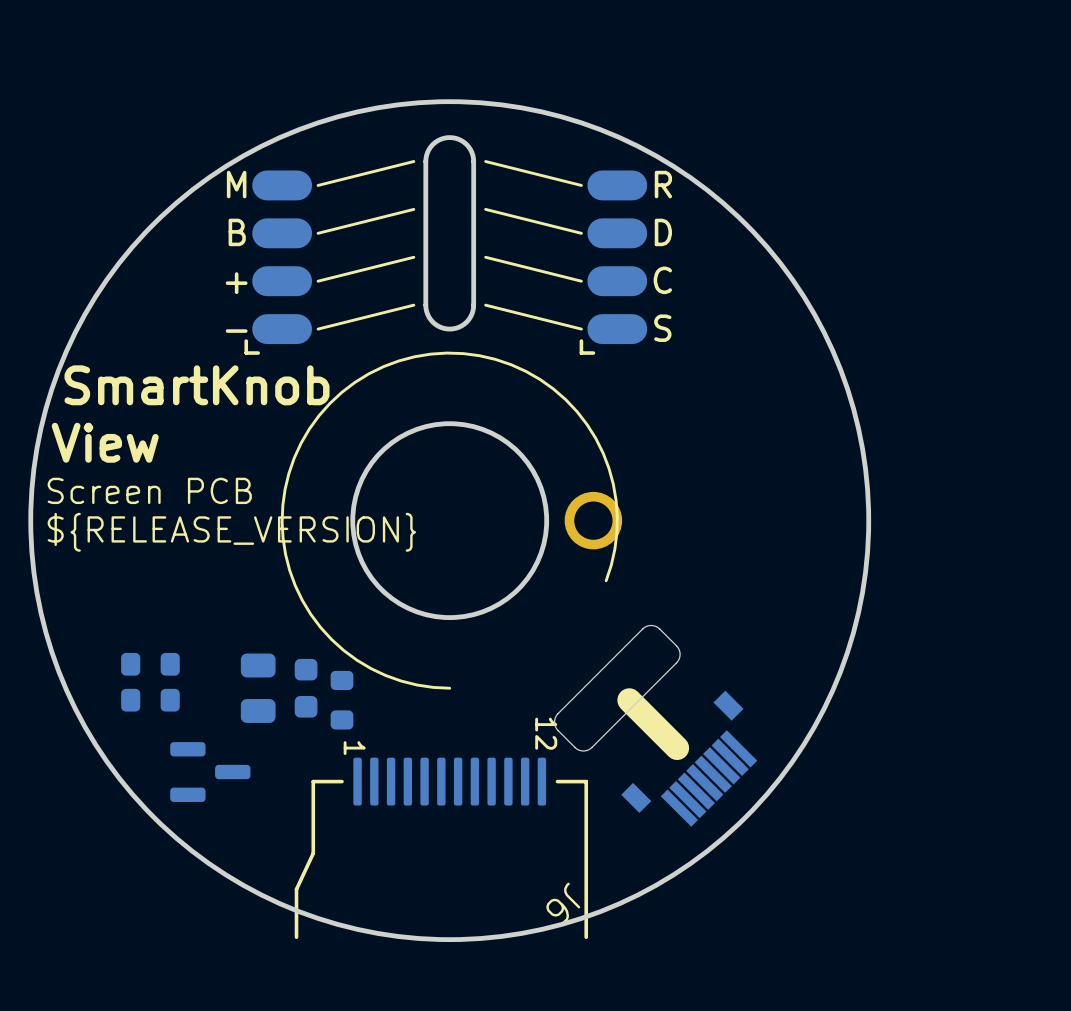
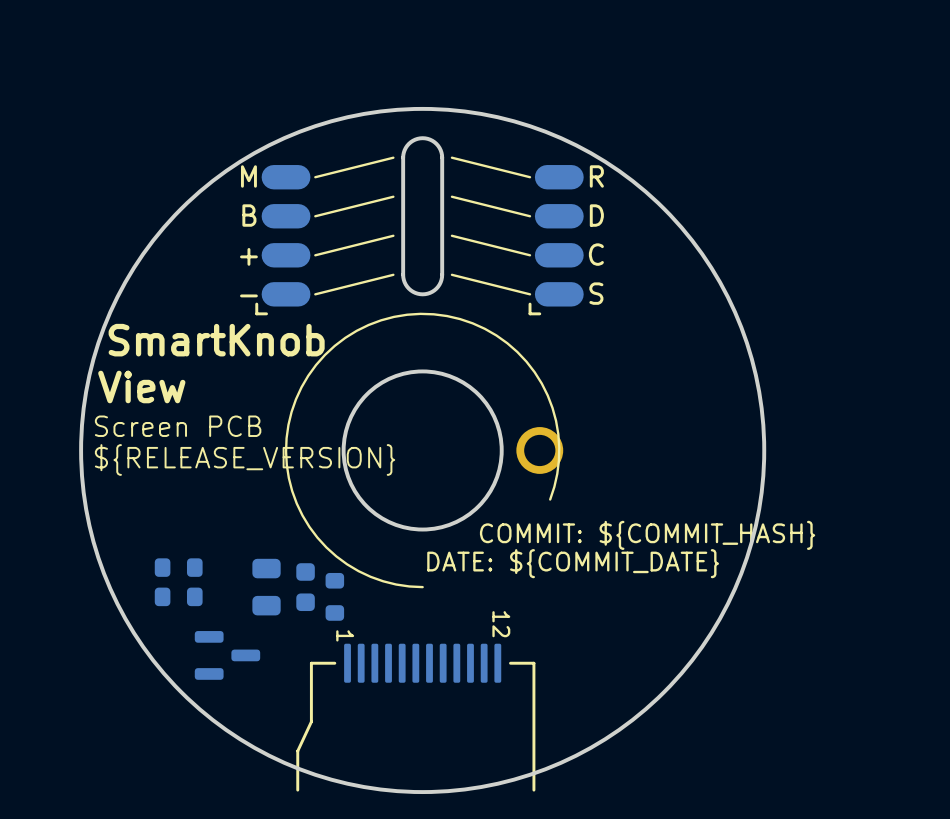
drawing: [553, 624, 681, 752] -> none
text: none -> COMMIT: ${COMMIT_HASH} (647, 535)
text: none -> DATE: ${COMMIT_DATE} (573, 563)
line: (629, 700) (677, 748) -> none
J6: (689, 758) -> none

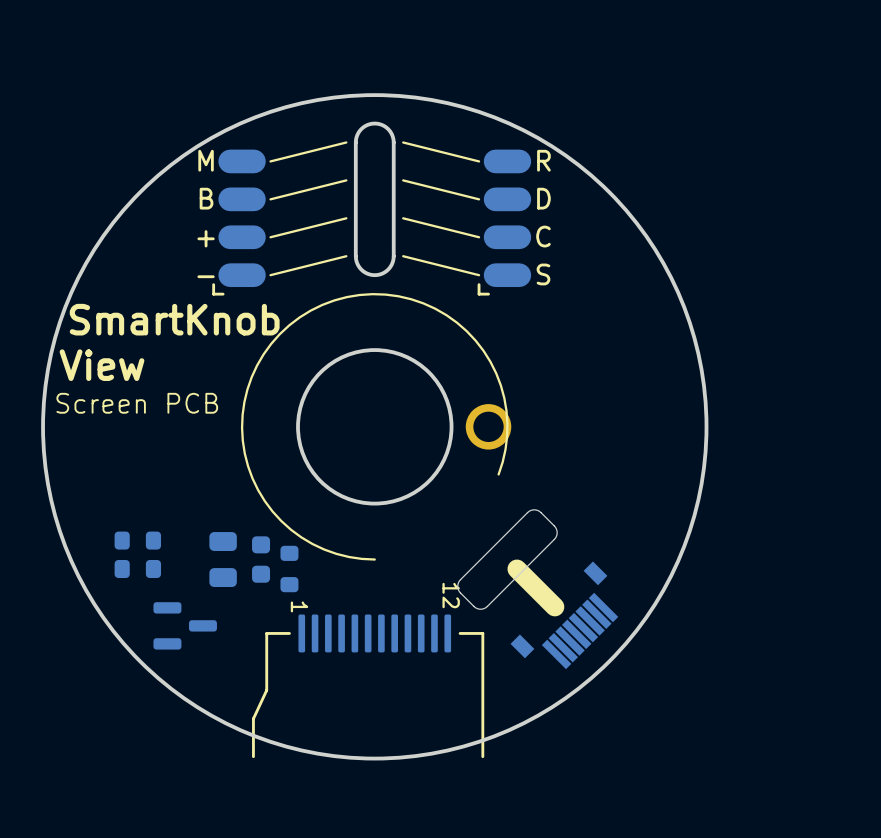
text: ${RELEASE_VERSION} (245, 459) -> none
drawing: none -> [457, 509, 558, 610]
text: COMMIT: ${COMMIT_HASH} (647, 535) -> none
text: DATE: ${COMMIT_DATE} (573, 563) -> none
line: none -> (516, 569) (554, 606)
part: none -> (564, 615)

